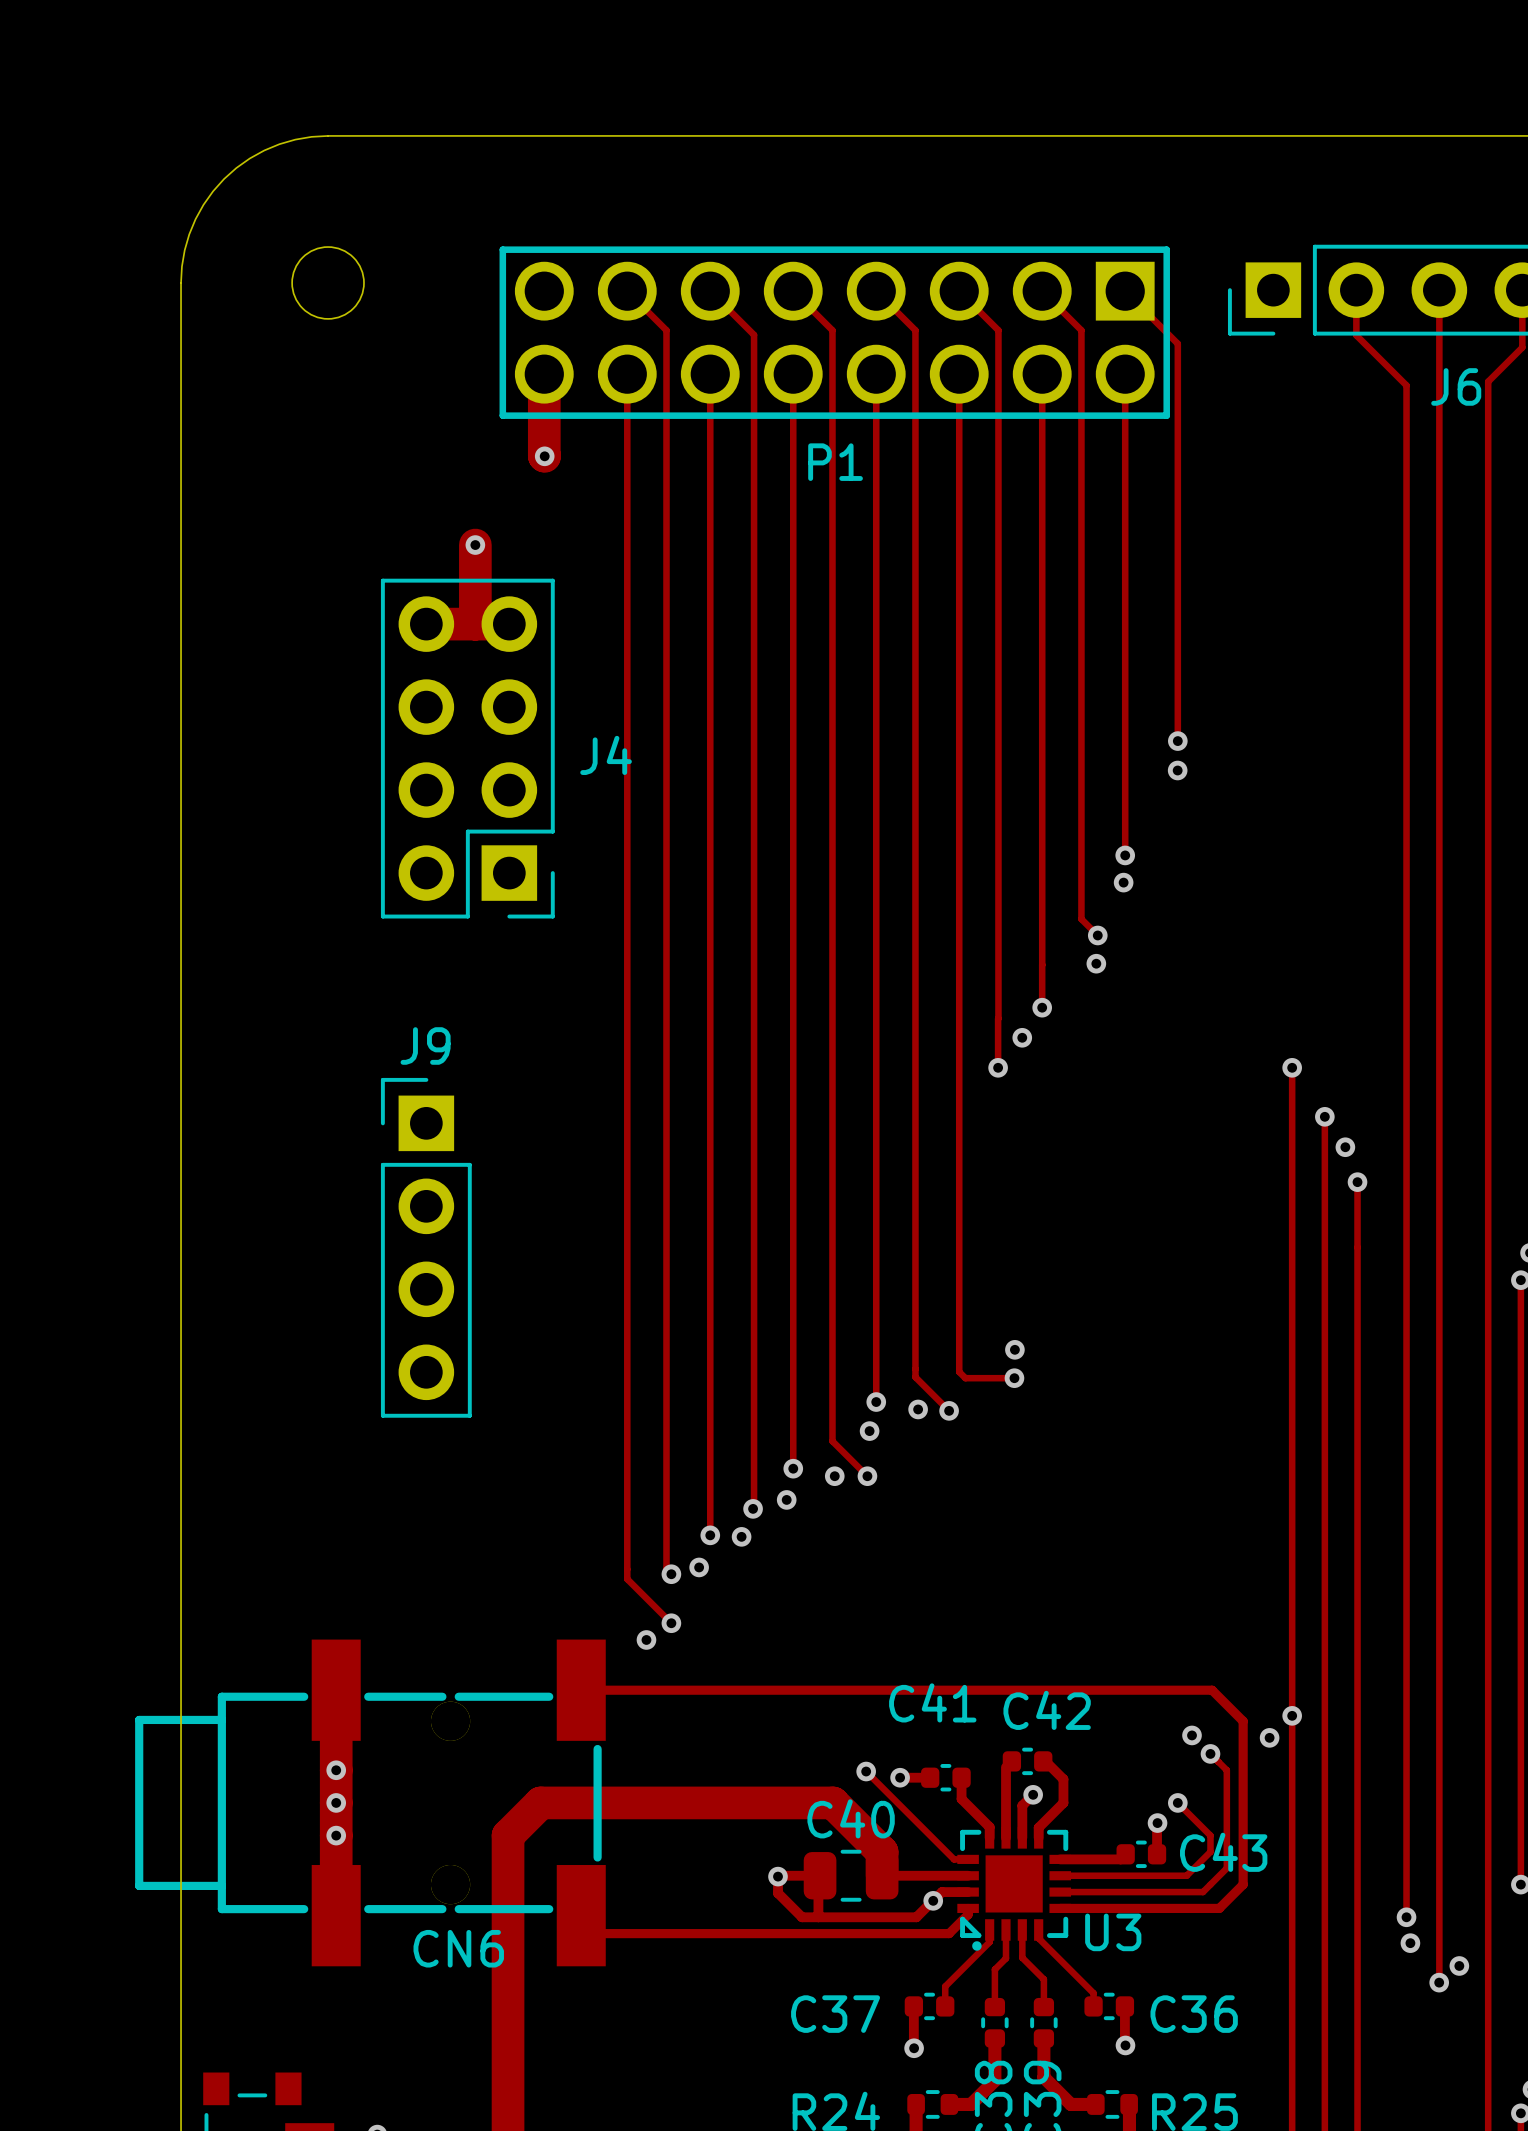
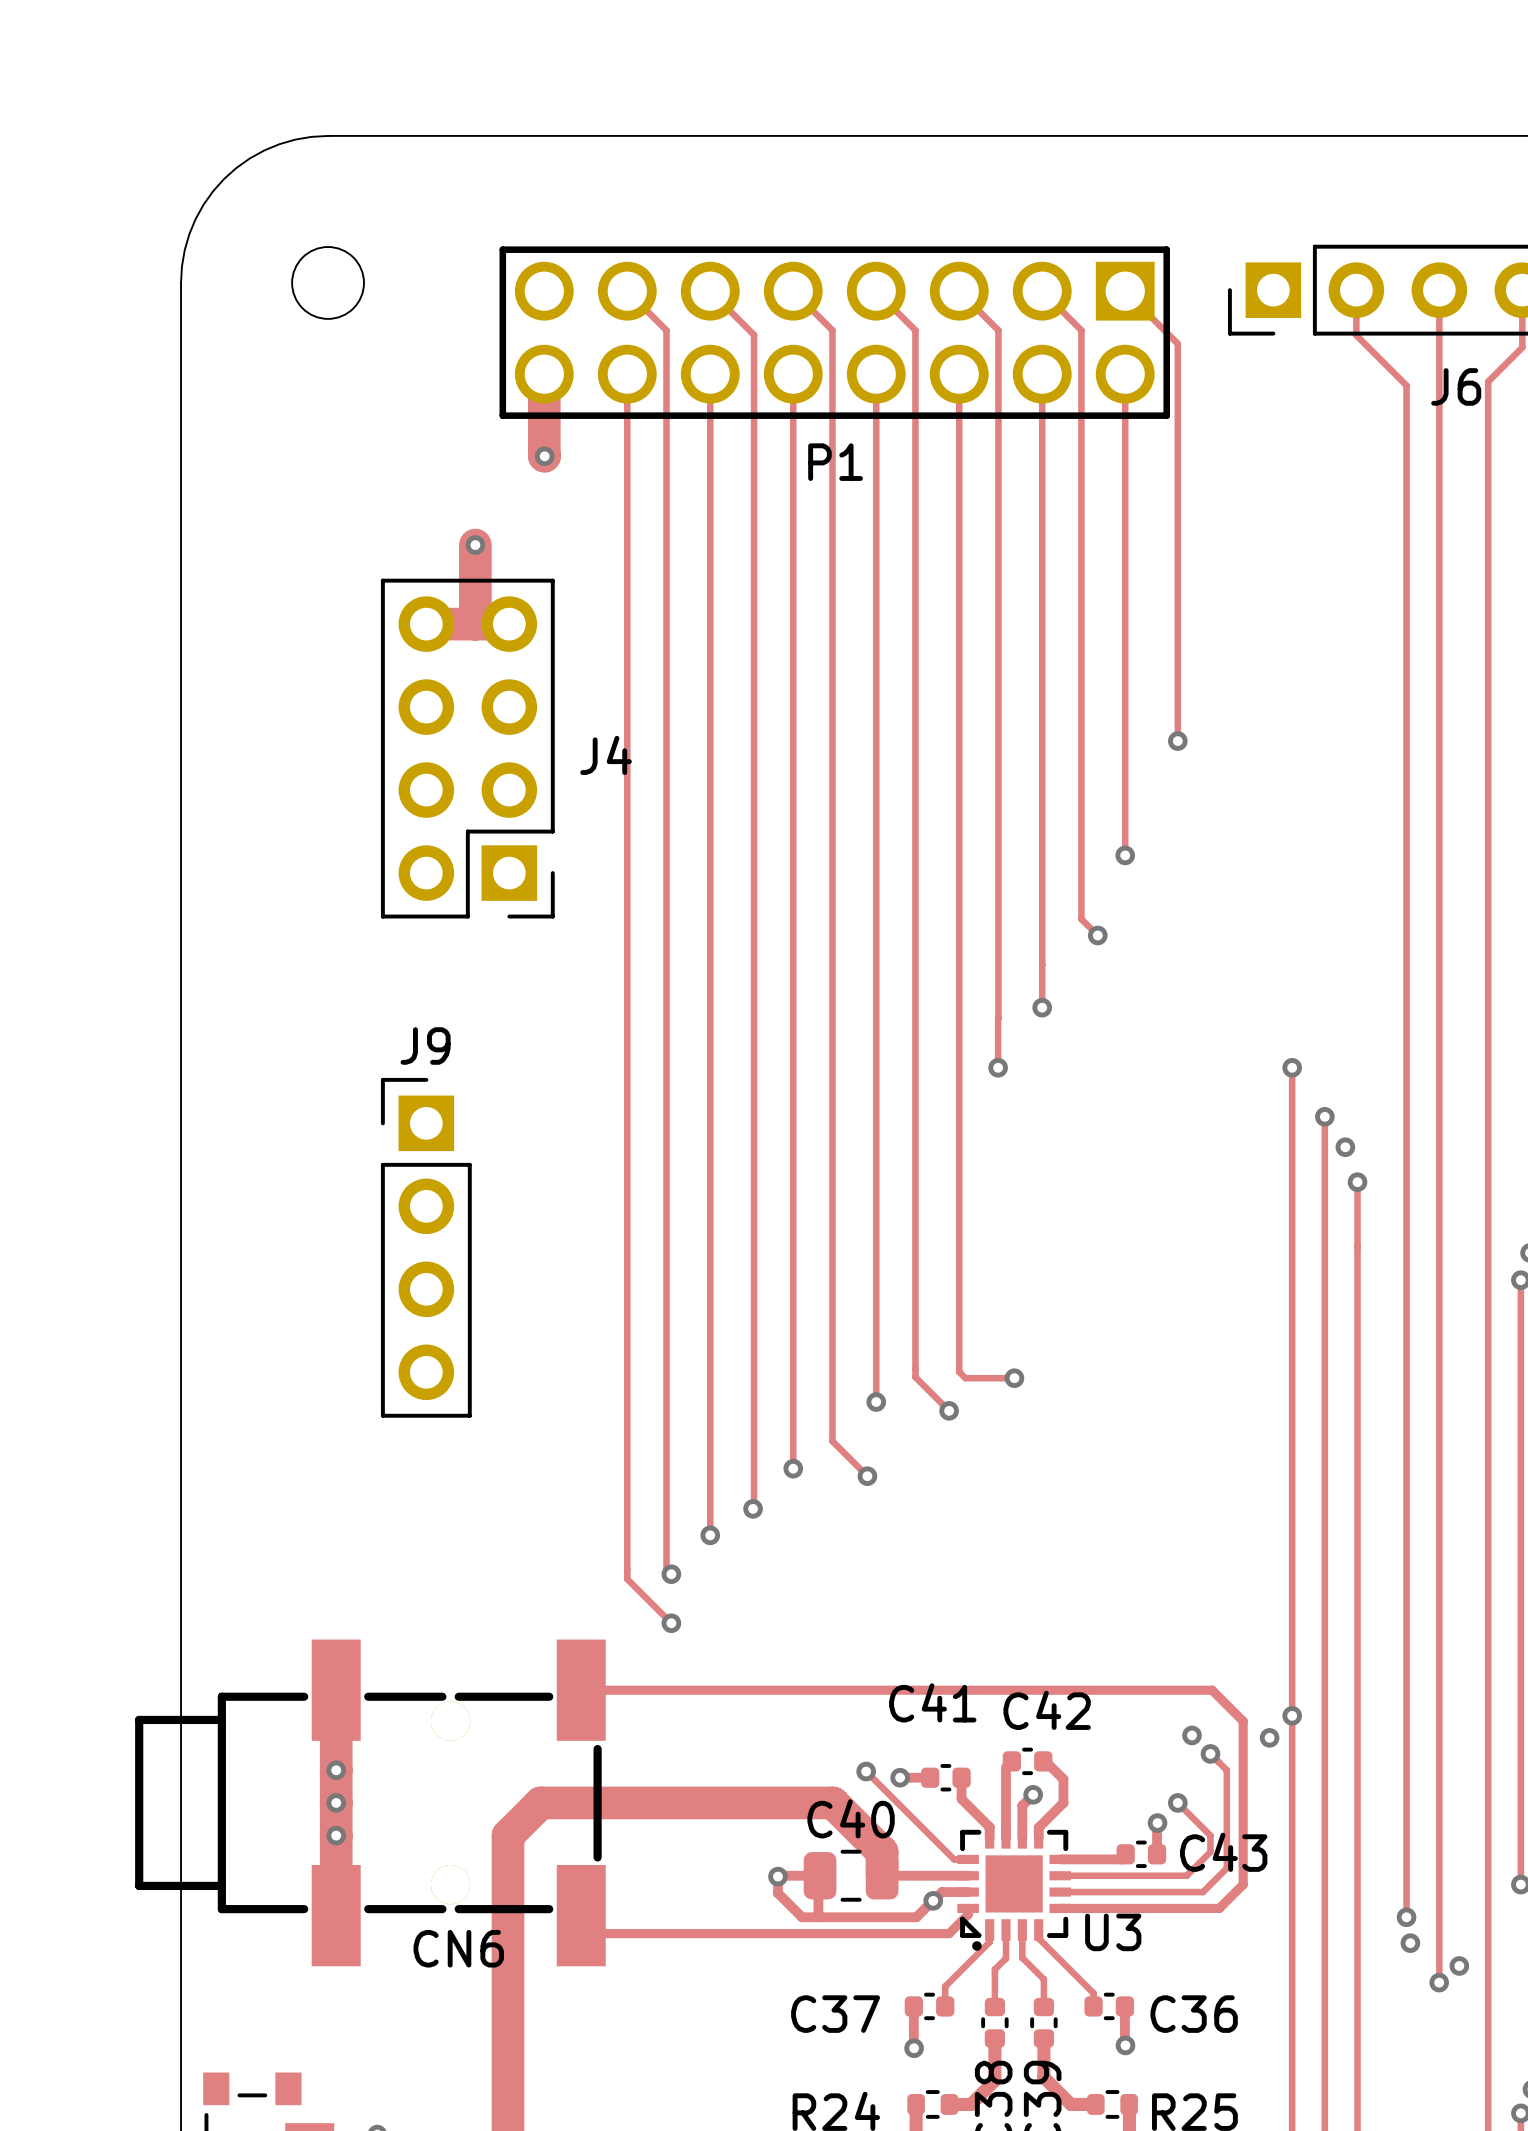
via: (1177, 770) -> none
via: (1123, 882) -> none
via: (1096, 963) -> none
via: (1022, 1037) -> none
via: (1014, 1349) -> none
via: (918, 1409) -> none
via: (869, 1431) -> none
via: (834, 1476) -> none
via: (786, 1499) -> none
via: (741, 1536) -> none
via: (699, 1567) -> none
via: (646, 1639) -> none

